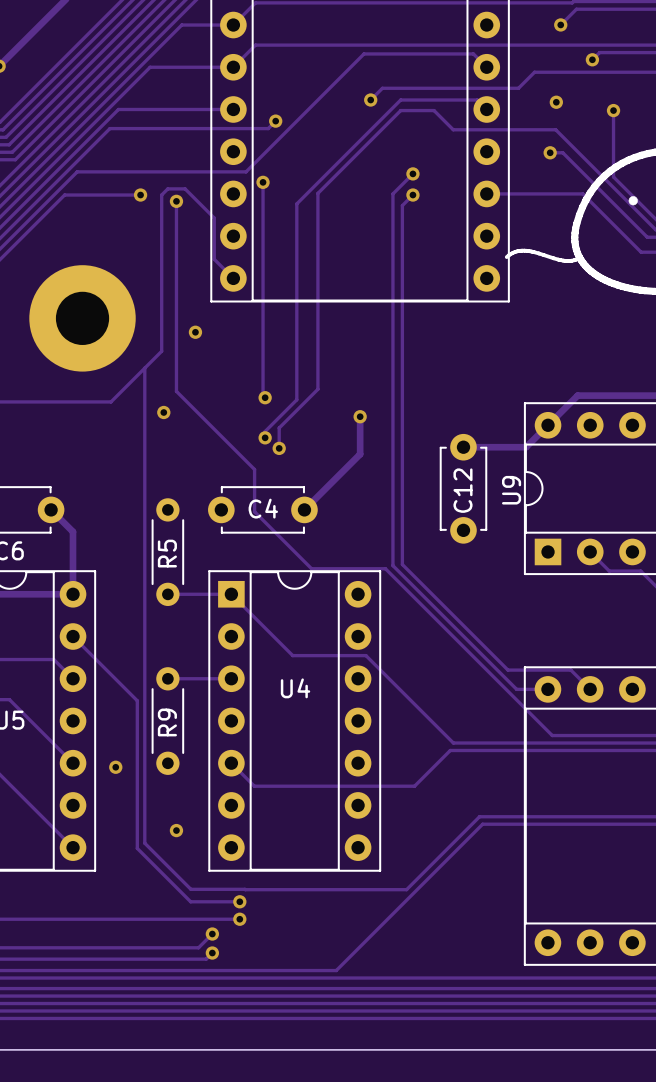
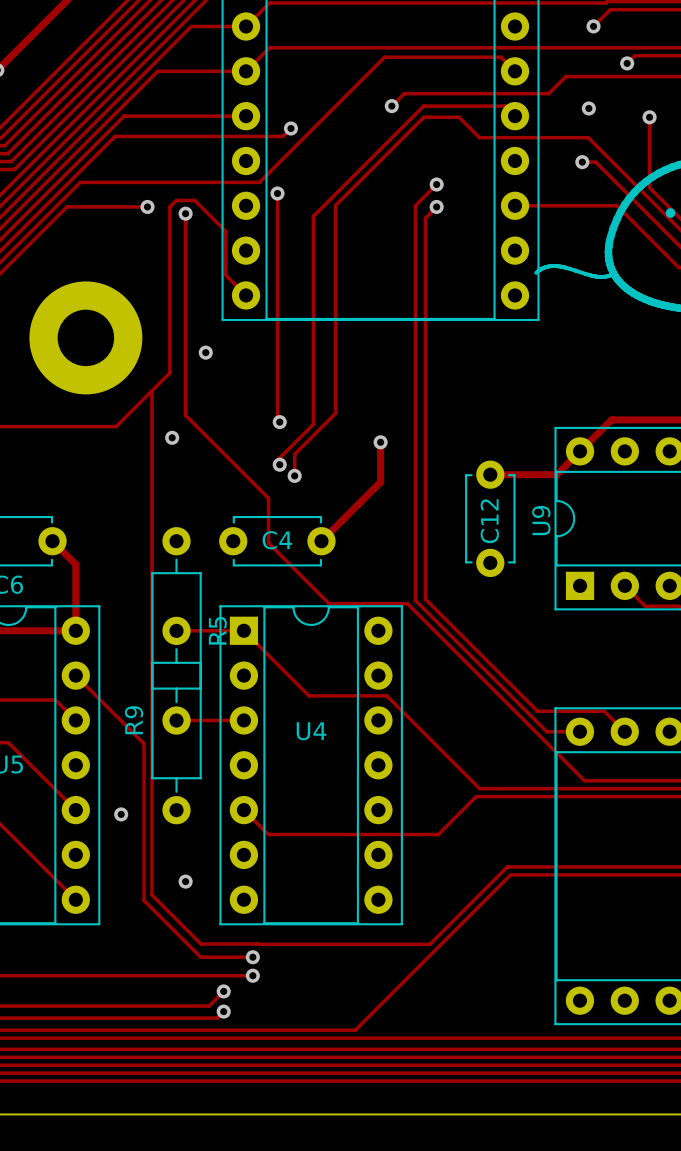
R5 footprint: [151, 498, 185, 607] -> [151, 527, 202, 735]
R5 name position: R5 (167, 553) -> R5 (217, 630)
R9 footprint: [151, 667, 185, 775] -> [151, 616, 202, 825]
R9 name position: R9 (167, 722) -> R9 (134, 720)

